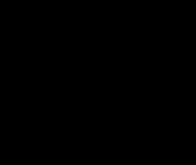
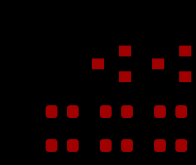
part: none -> (111, 63)
part: none -> (171, 63)
part: none -> (62, 111)
part: none -> (116, 111)
part: none -> (170, 111)
part: none -> (62, 145)
part: none -> (116, 145)
part: none -> (170, 145)

